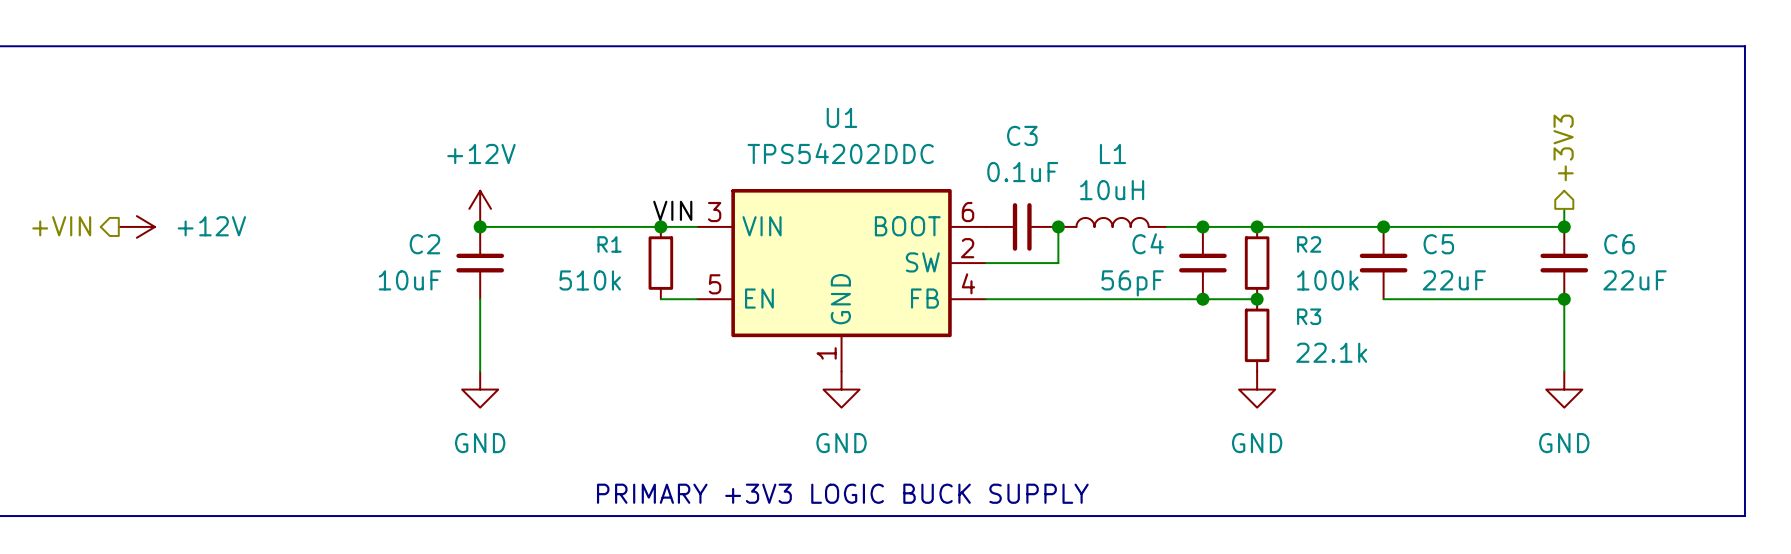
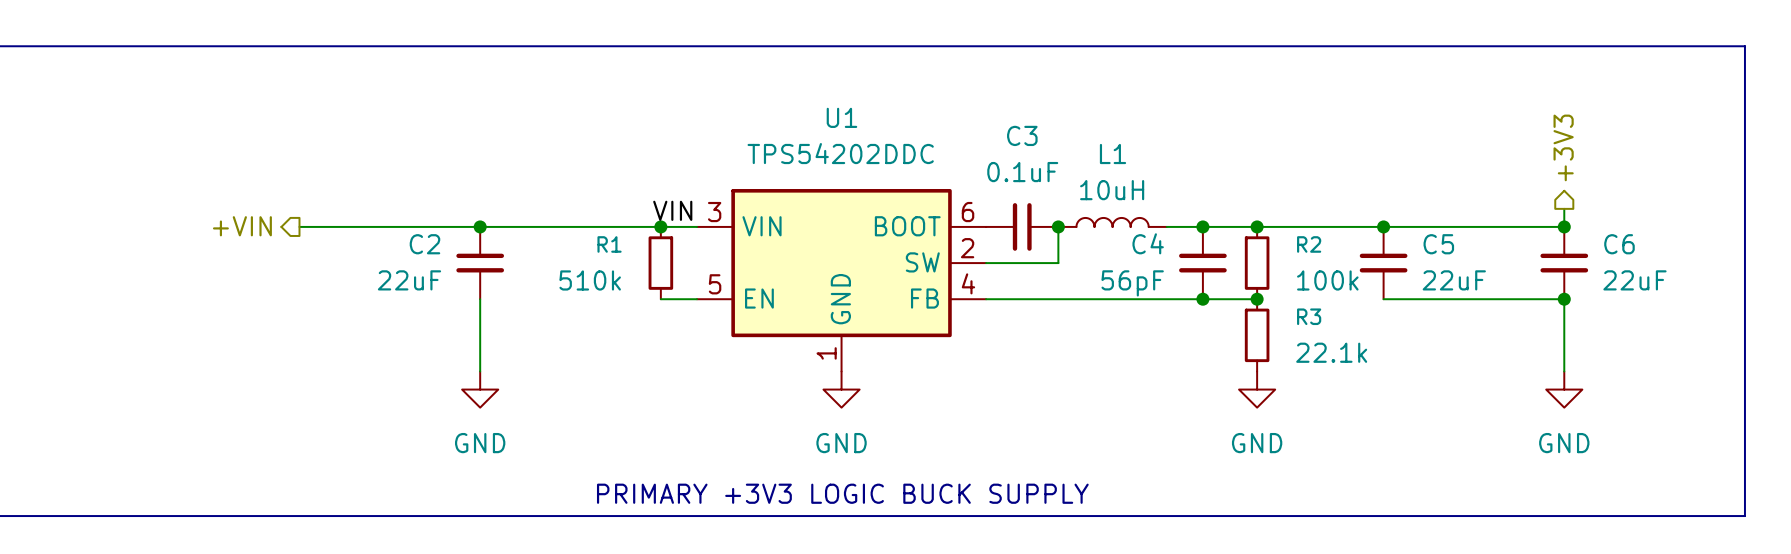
power symbol: +12V (480, 208) -> none
hierarchical label position: +VIN (61, 226) -> +VIN (242, 226)
power symbol: +12V (136, 226) -> none
wire: none -> (299, 226) (480, 226)
C2 value: 10uF (409, 280) -> 22uF (409, 280)

